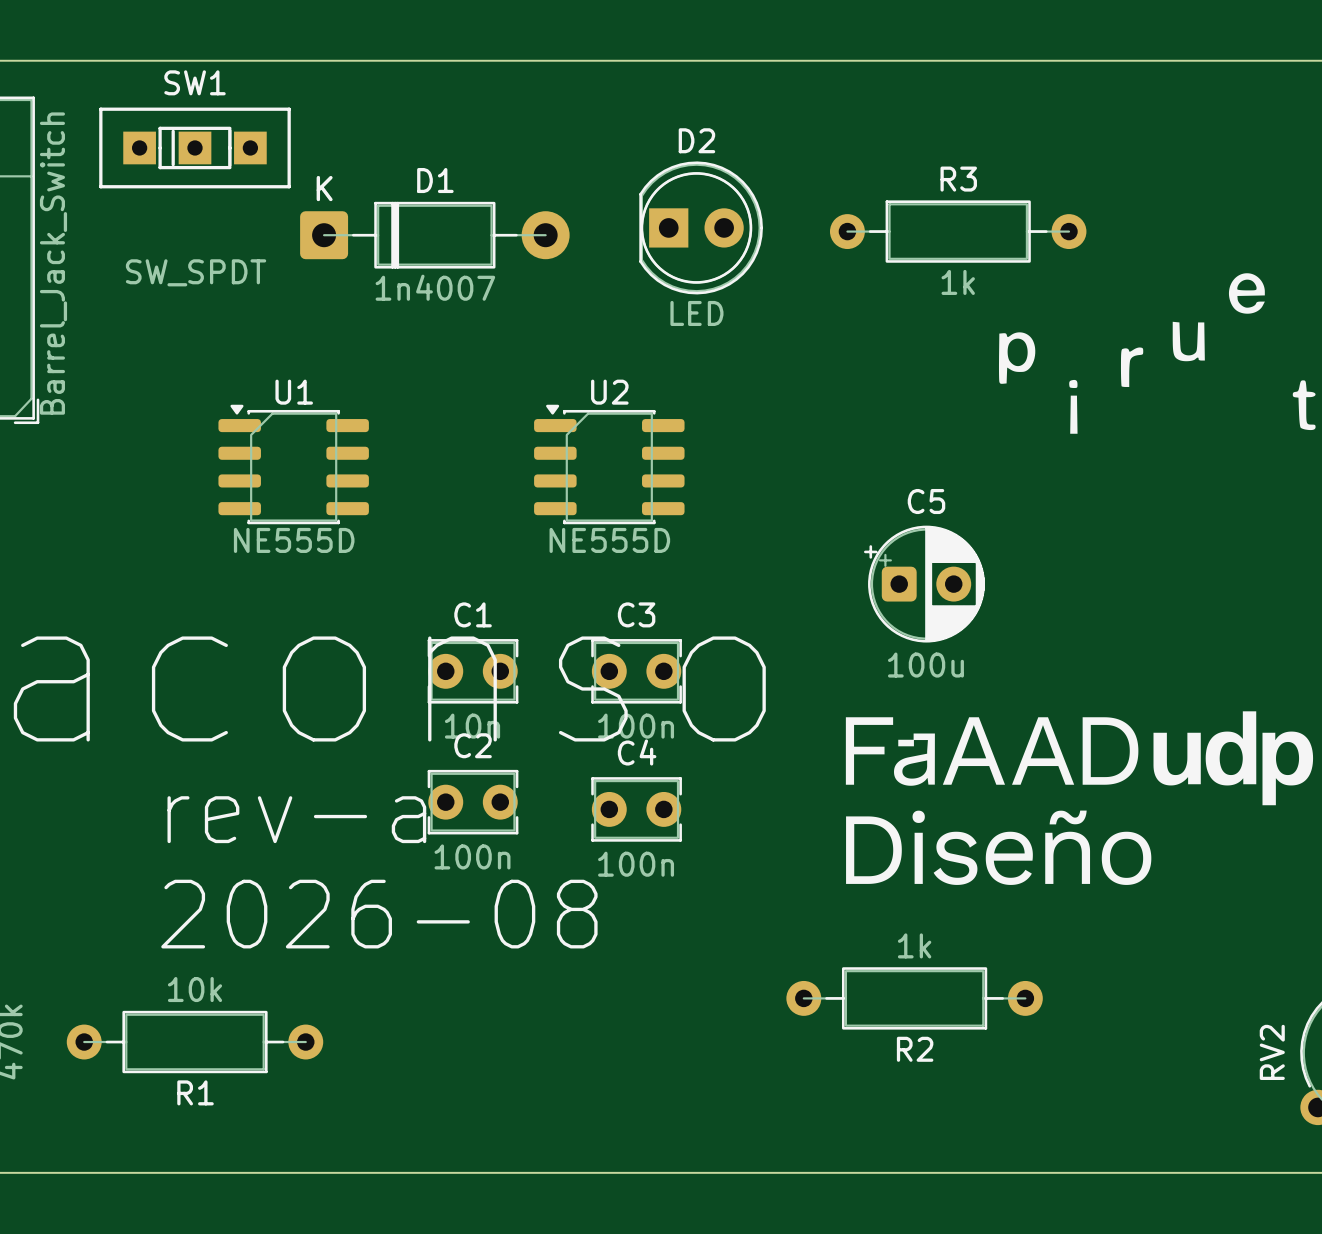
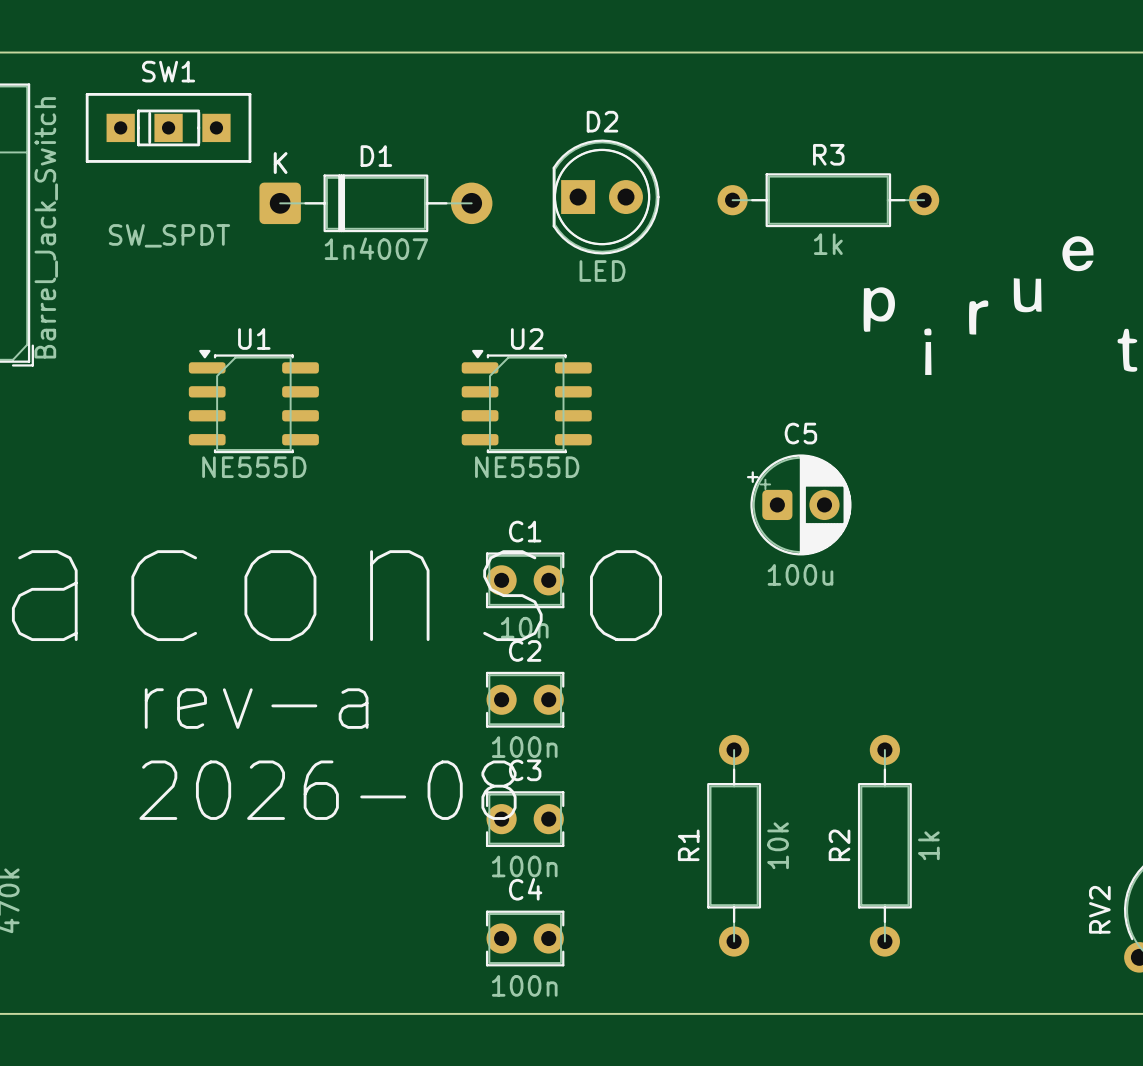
C1 position: (473, 671) -> (525, 580)
C3 position: (636, 671) -> (525, 819)
drawing: [845, 711, 1314, 885] -> none
C2 position: (473, 802) -> (525, 699)
C4 position: (636, 809) -> (525, 938)
R2 rotation: 0° (914, 998) -> 90° clockwise (884, 845)
R1 rotation: 0° (195, 1042) -> 90° clockwise (734, 845)
R1 position: (195, 1042) -> (734, 845)

